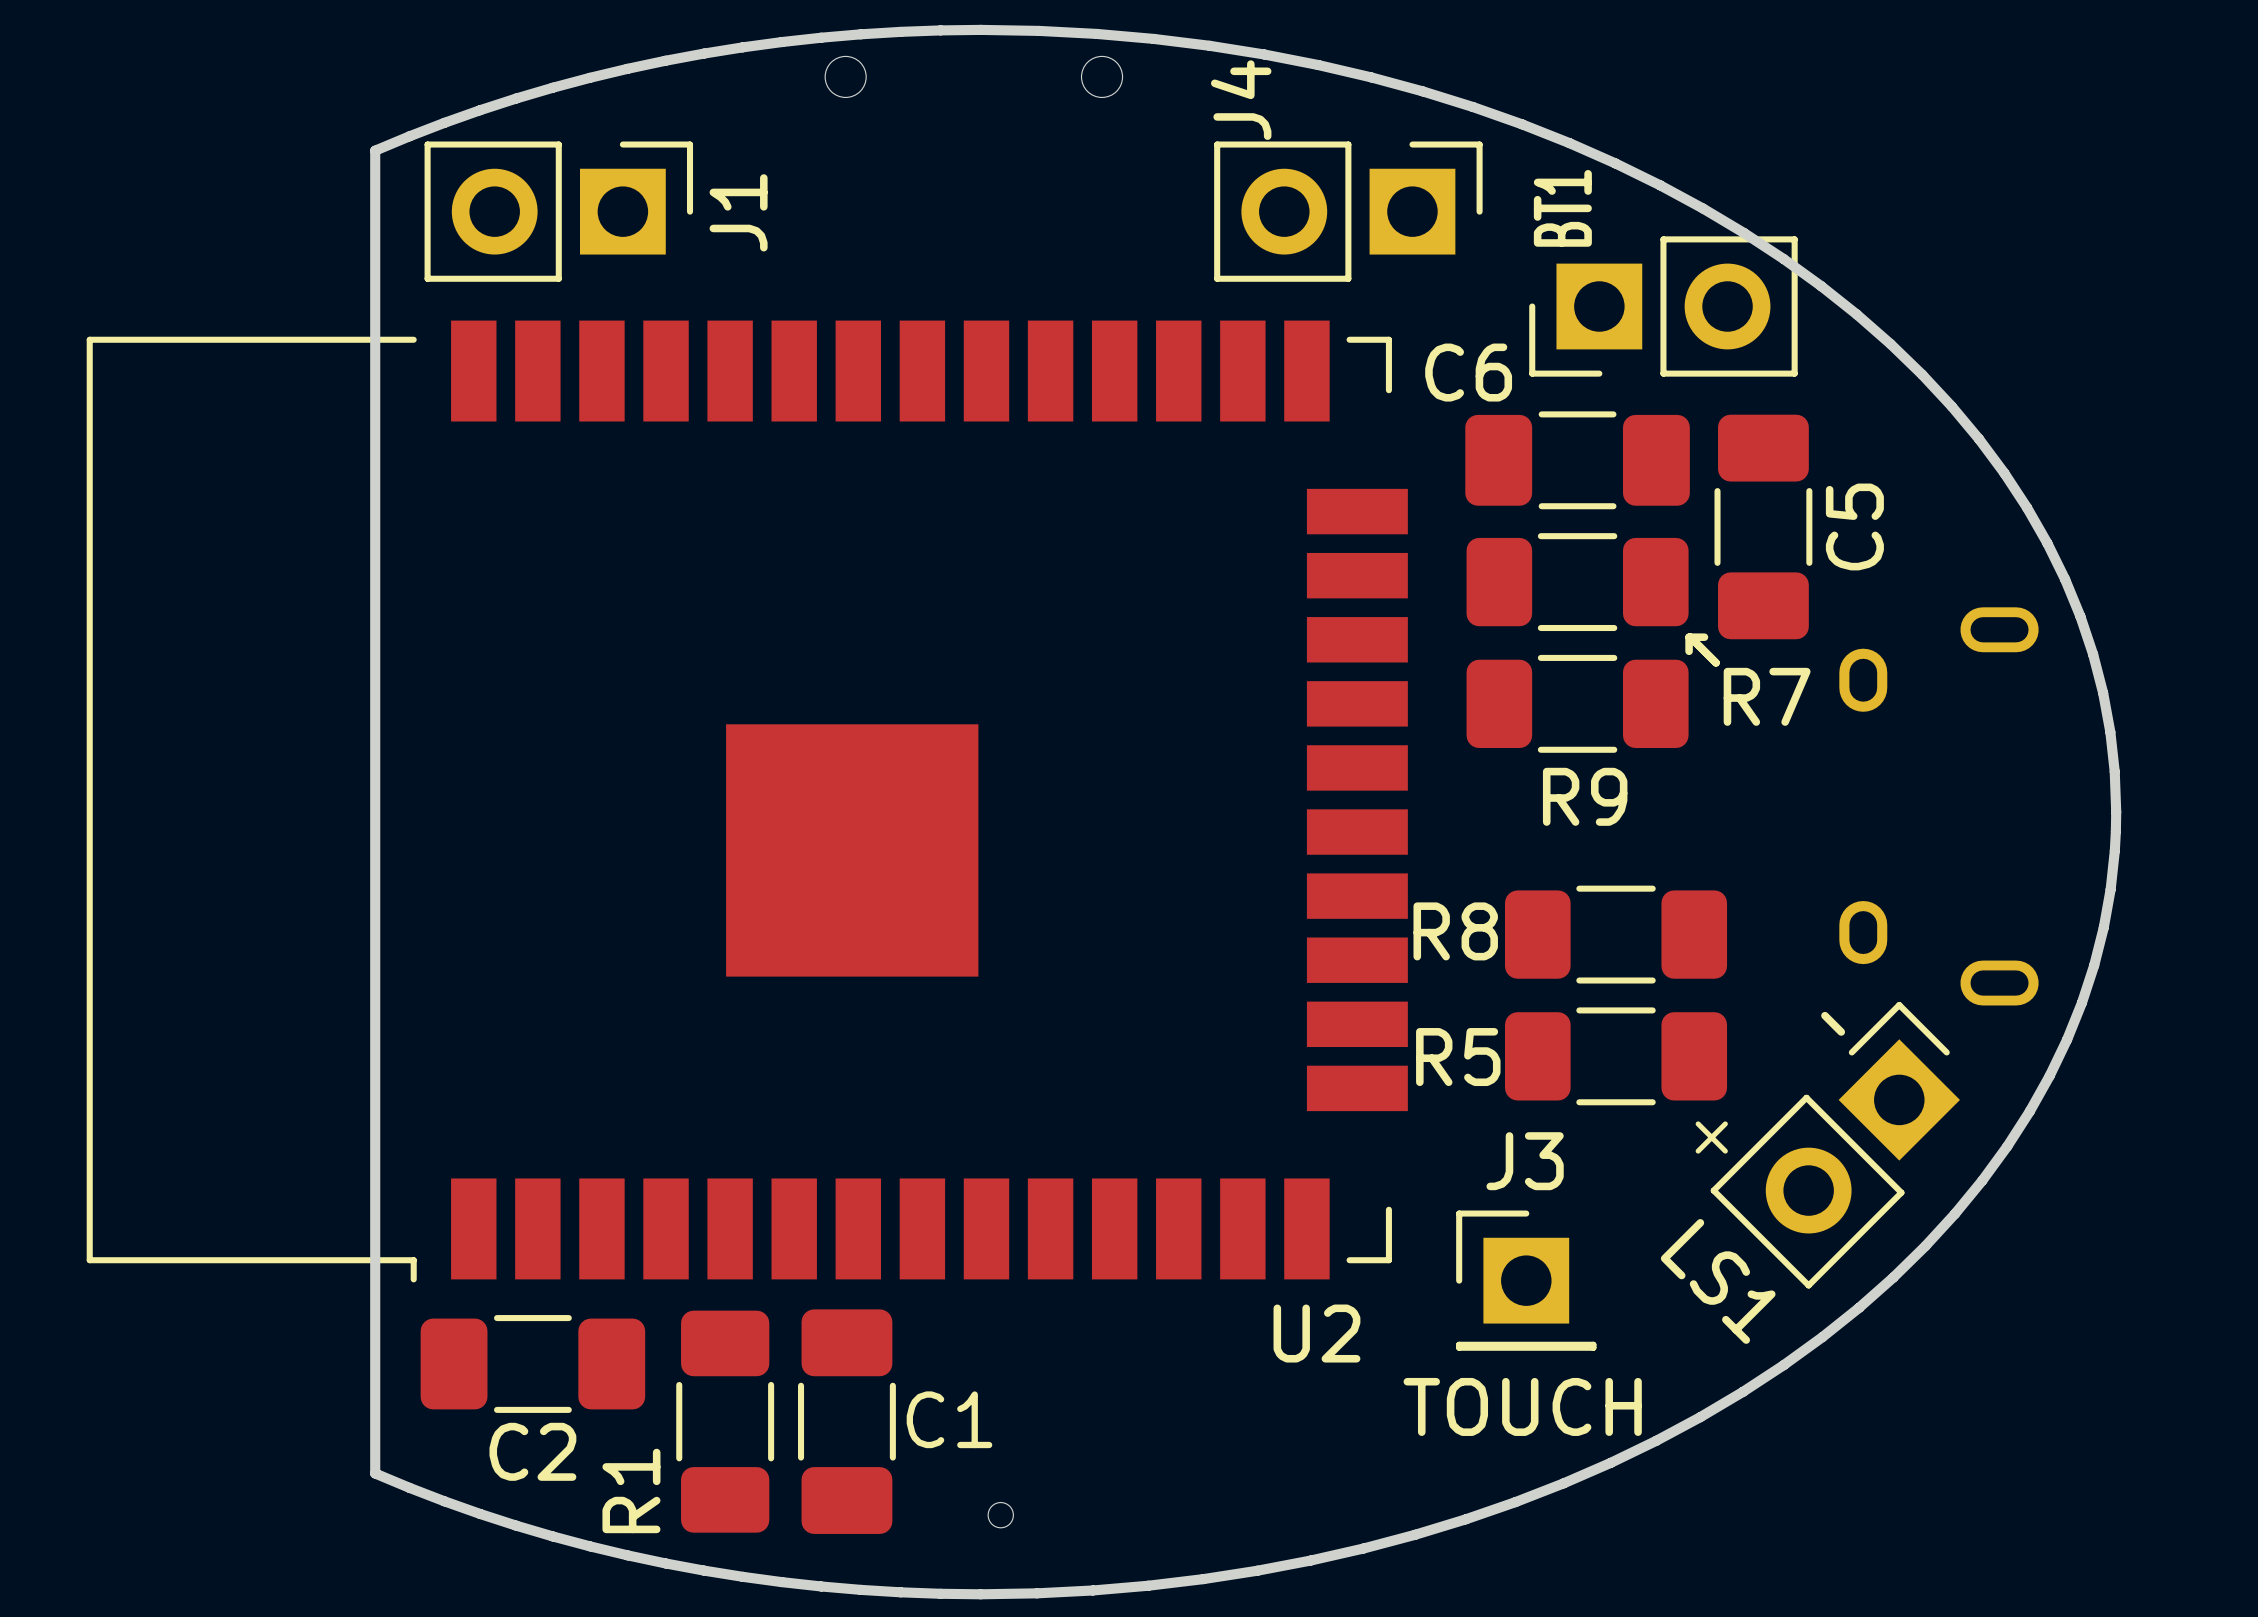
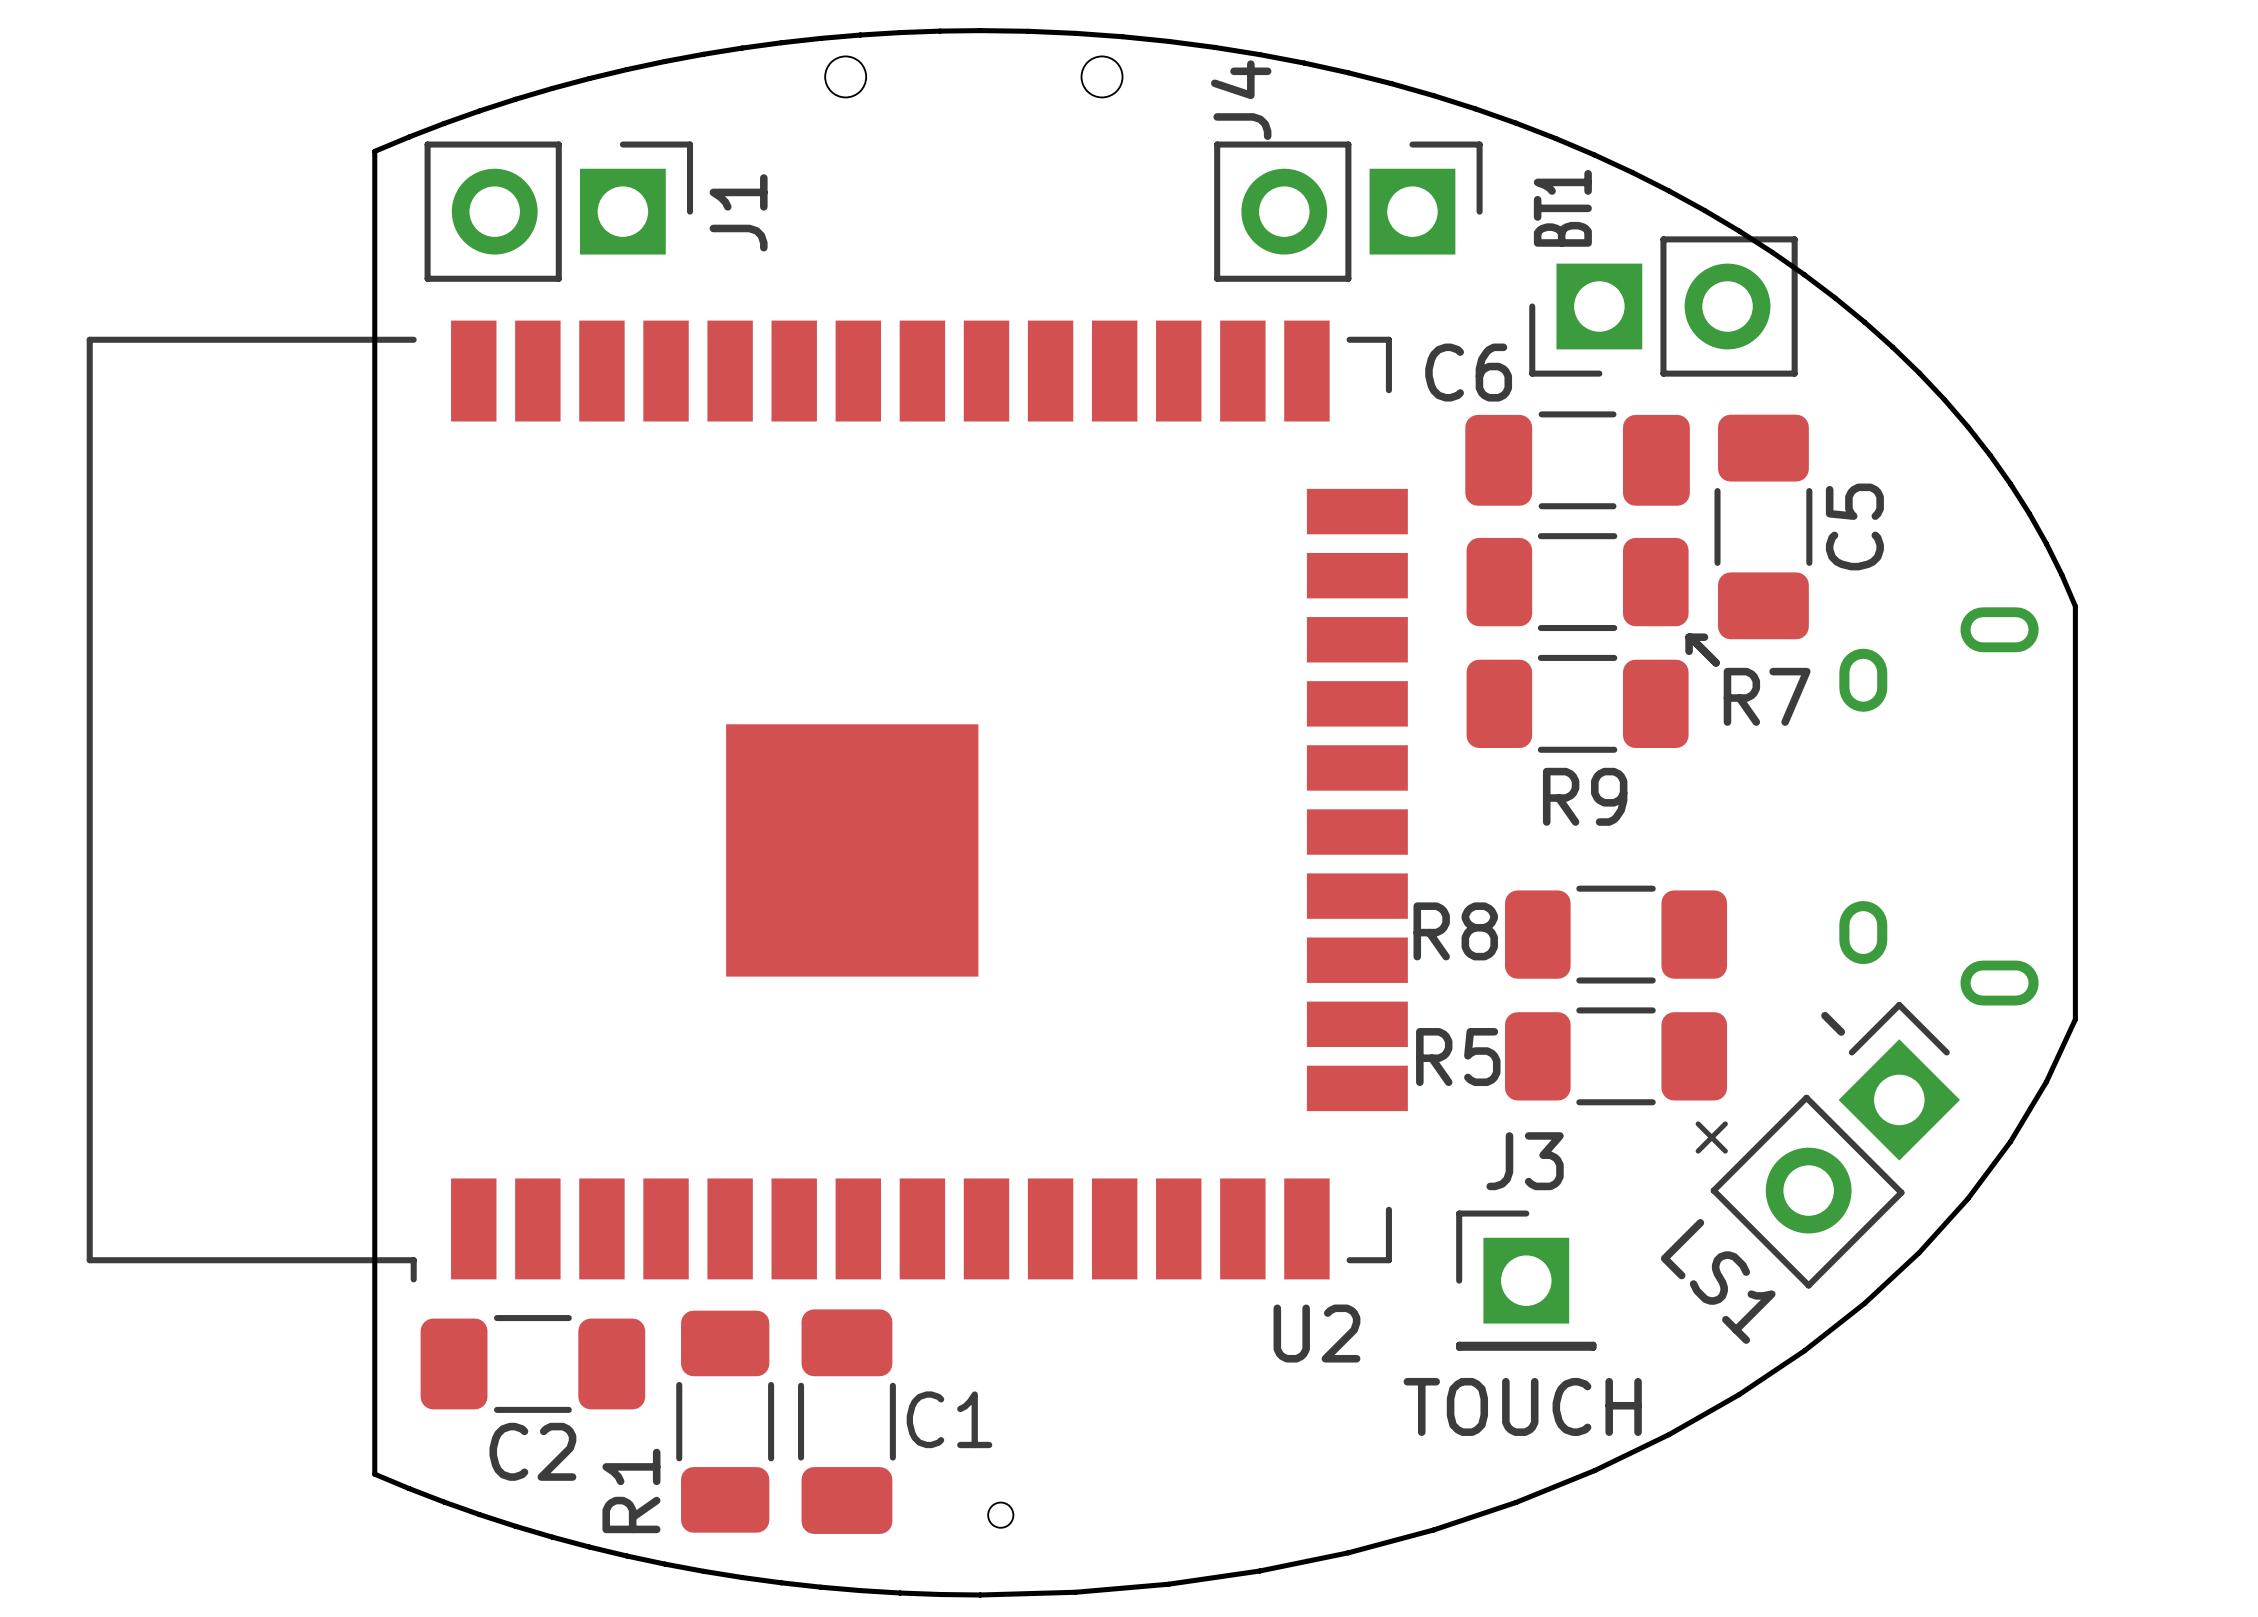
board edge: (980, 29) (900, 31) (821, 37) (742, 47) (665, 60) (589, 77) (516, 98) (444, 122) (375, 150) (375, 1473) (480, 1513) (552, 1536) (627, 1555) (704, 1570) (781, 1582) (900, 1592) (1037, 1593) (1093, 1590) (1203, 1579) (1311, 1560) (1363, 1548) (1465, 1519) (1563, 1483) (1656, 1440) (1742, 1391) (1783, 1365) (1822, 1337) (1893, 1277) (1955, 1213) (2007, 1146) (2049, 1075) (2081, 1002) (2103, 927) (2110, 889) (2115, 831) (2114, 771) (2110, 732) (2093, 654) (2080, 616) (2047, 543) (2004, 472) (1951, 406) (1922, 374) (1856, 314) (1783, 259) (1703, 208) (1615, 163) (1522, 124) (1422, 91) (1371, 77) (1264, 54) (1153, 38) (1039, 30) (980, 29) -> (980, 30) (900, 32) (820, 38) (742, 48) (665, 61) (589, 78) (515, 99) (444, 123) (374, 151) (374, 1474) (479, 1514) (552, 1537) (627, 1556) (703, 1571) (781, 1582) (900, 1593) (980, 1595) (1075, 1592) (1168, 1584) (1259, 1571) (1348, 1552) (1433, 1529) (1516, 1502) (1594, 1470) (1669, 1434) (1739, 1394) (1804, 1350) (1864, 1303) (1919, 1252) (1968, 1198) (2010, 1141) (2046, 1081) (2075, 1019) (2075, 606) (2046, 543) (2010, 484) (1968, 426) (1919, 372) (1864, 322) (1804, 274) (1739, 231) (1669, 191) (1594, 154) (1516, 123) (1433, 95) (1348, 72) (1259, 54) (1168, 41) (1075, 33) (980, 30)

